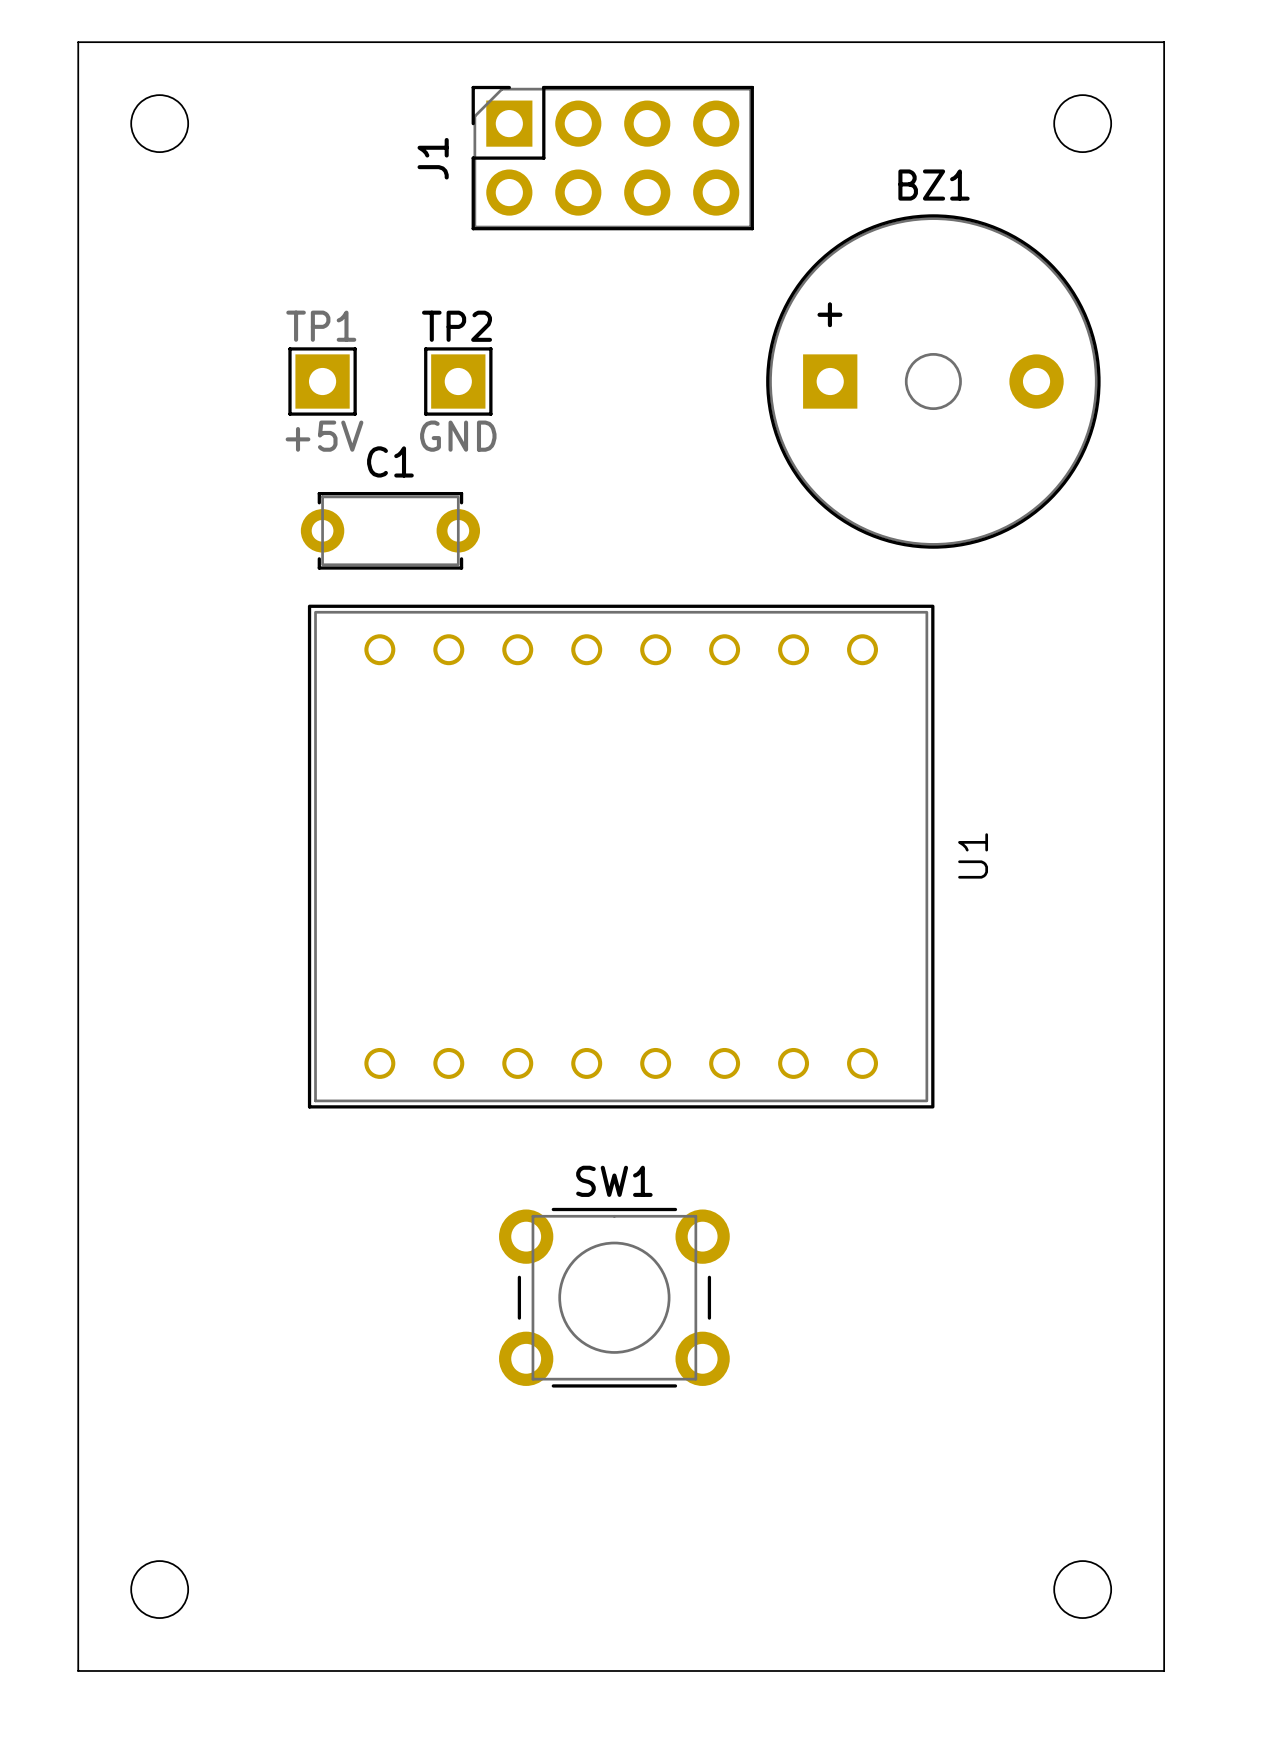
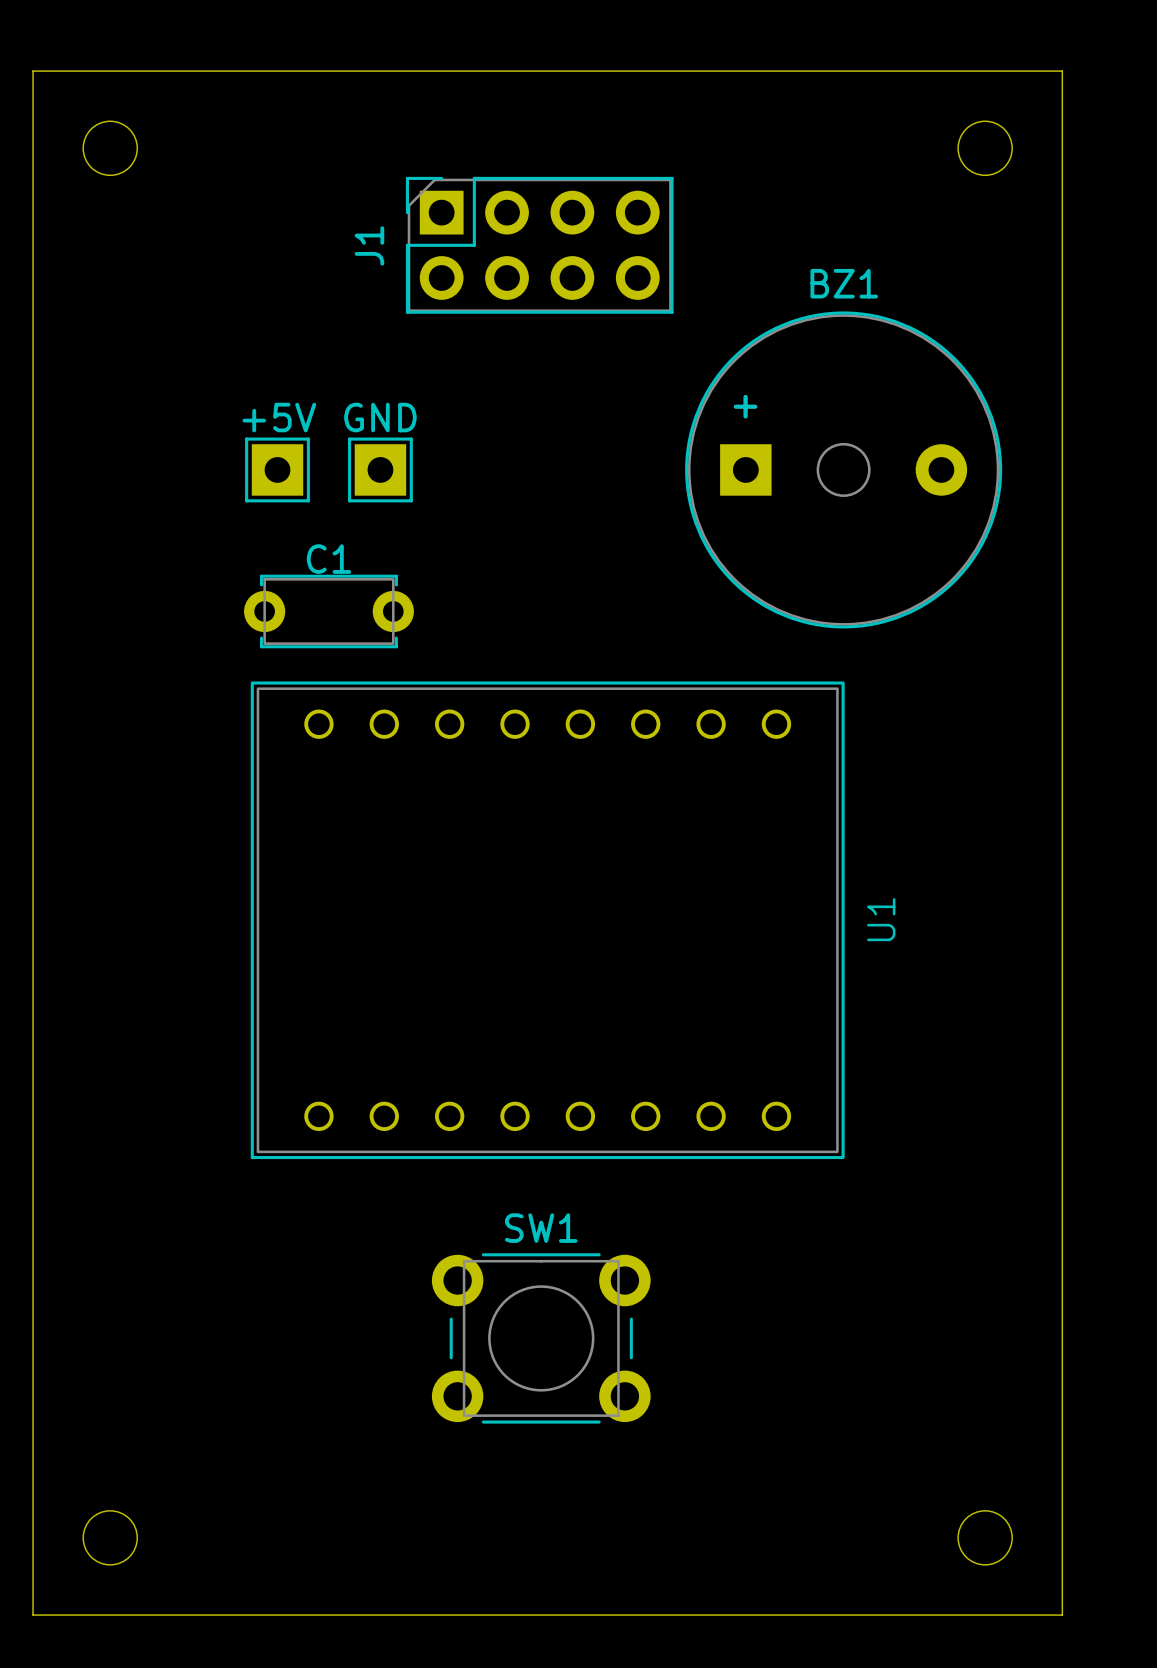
J1 position: (612, 158) -> (539, 245)
TP1: +5V (322, 381) -> none
TP2: GND (458, 381) -> none
BZ1 position: (933, 381) -> (843, 469)
C1 name position: C1 (390, 461) -> C1 (328, 559)
part: none -> +5V (277, 469)
part: none -> GND (380, 469)
C1 position: (390, 530) -> (328, 611)
U1 position: (621, 856) -> (547, 920)
SW1 position: (614, 1297) -> (541, 1338)

